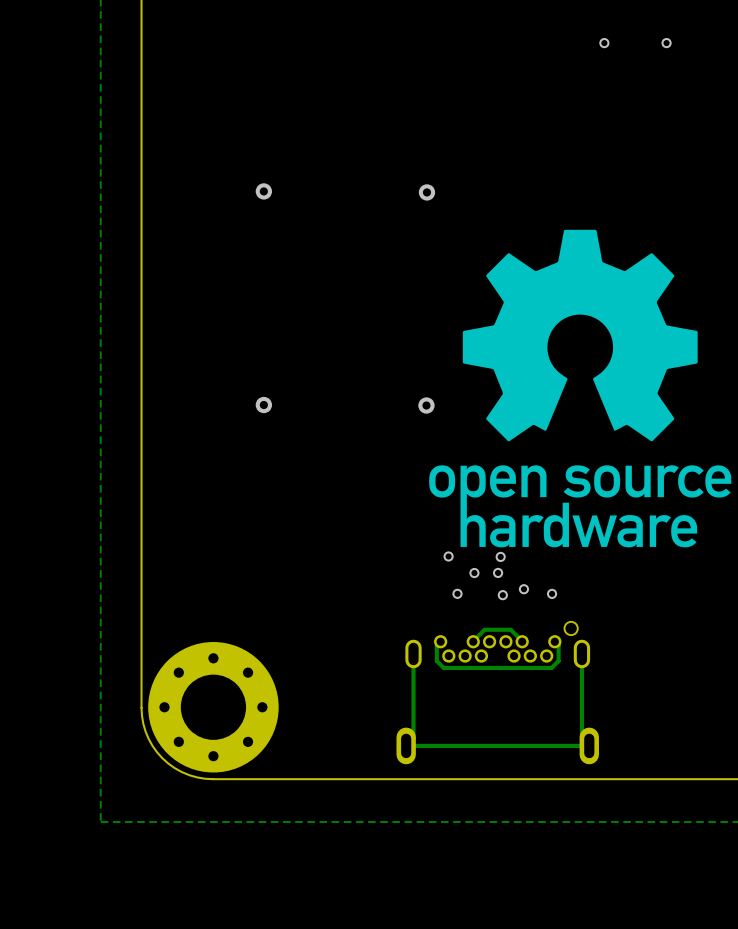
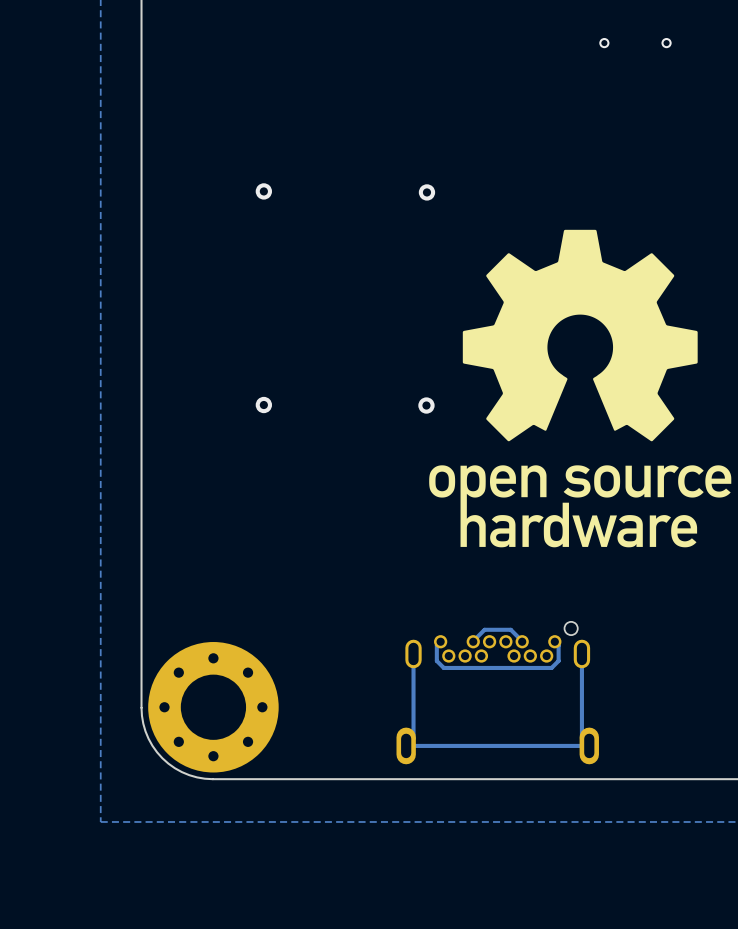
via: (448, 556) -> none
via: (500, 556) -> none
via: (498, 572) -> none
via: (474, 573) -> none
via: (523, 589) -> none
via: (457, 593) -> none
via: (552, 593) -> none
via: (502, 595) -> none

